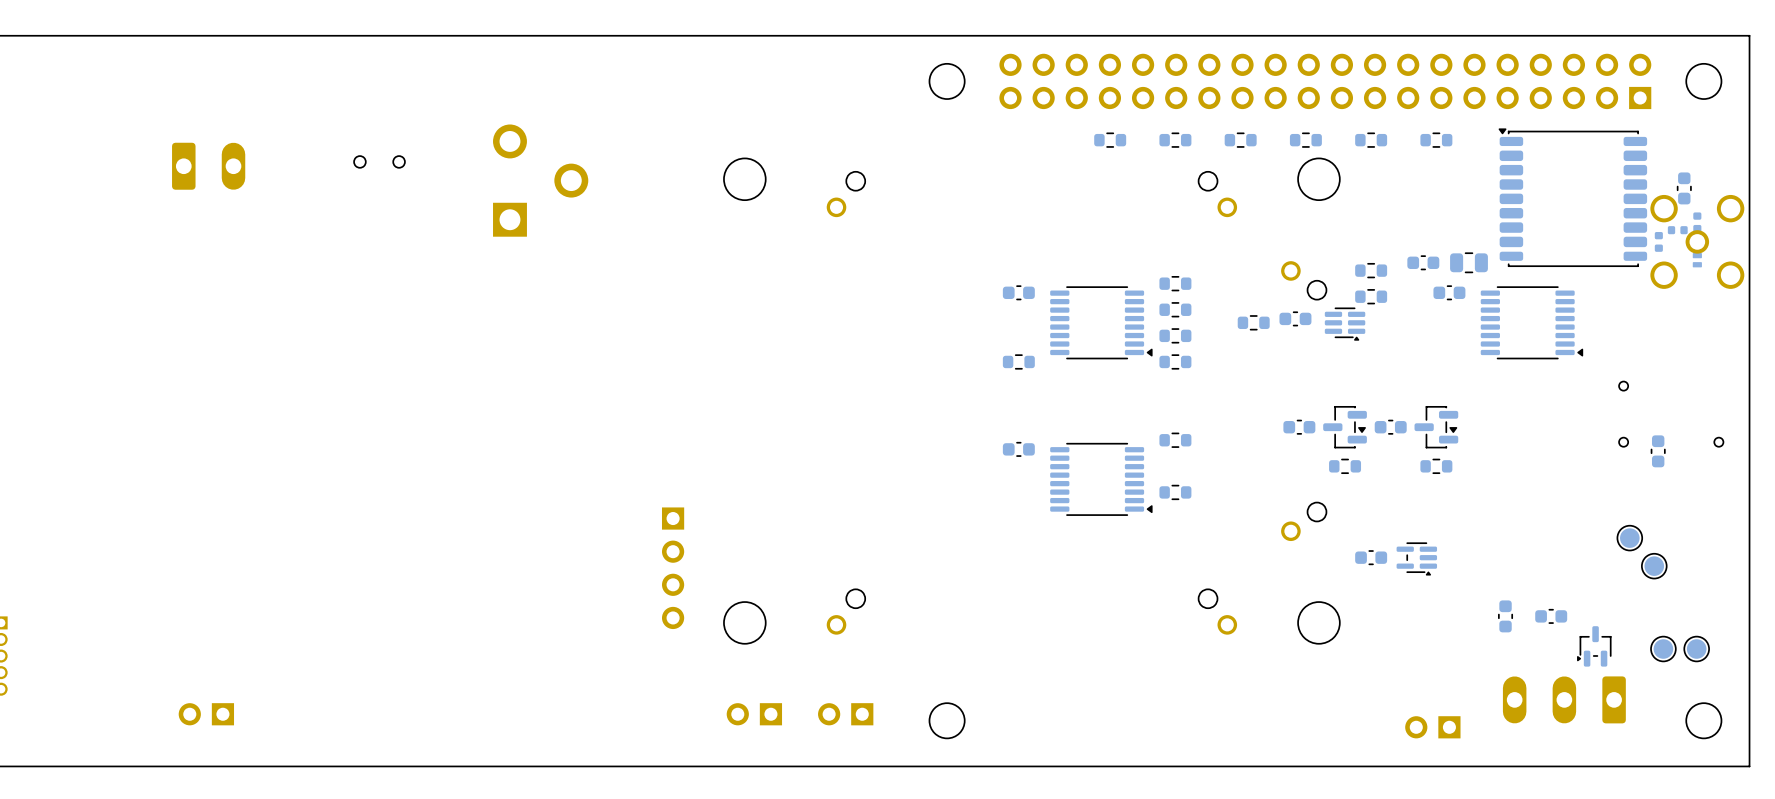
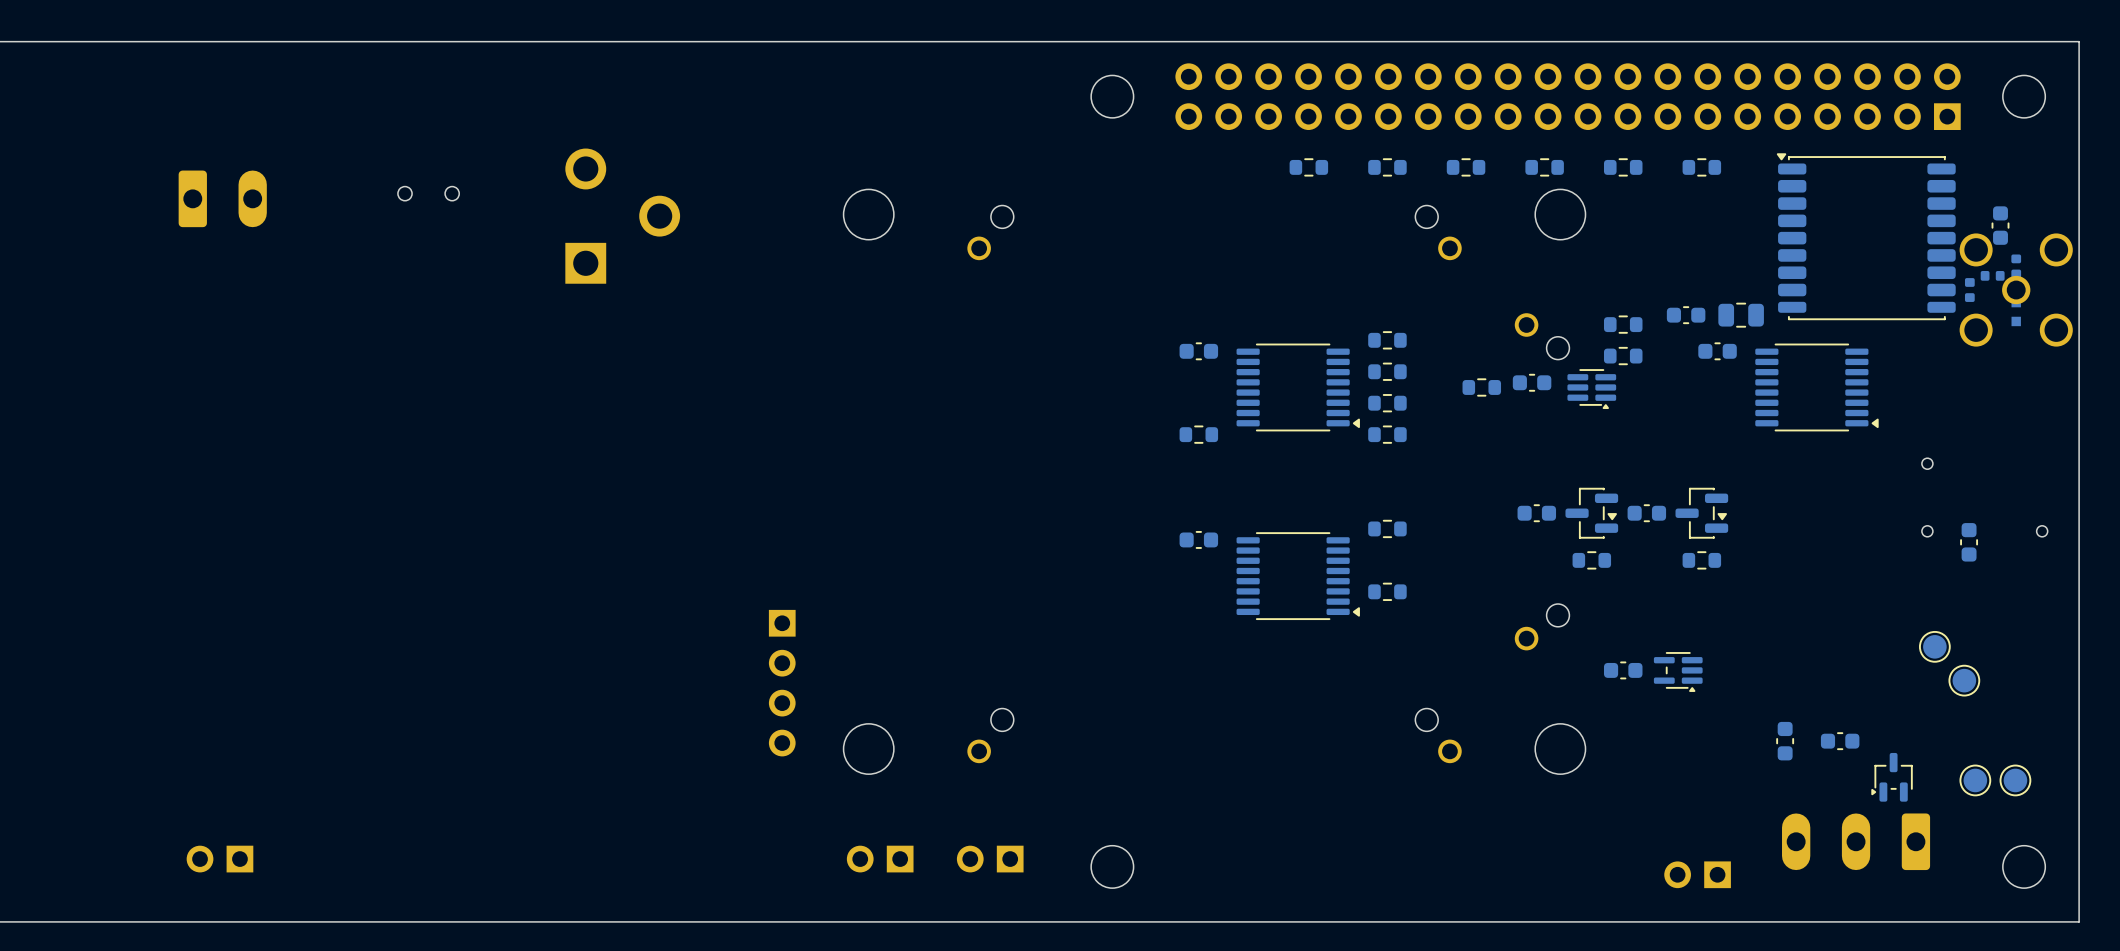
part footprint: [1692, 253, 1702, 268] -> [2011, 297, 2021, 327]

